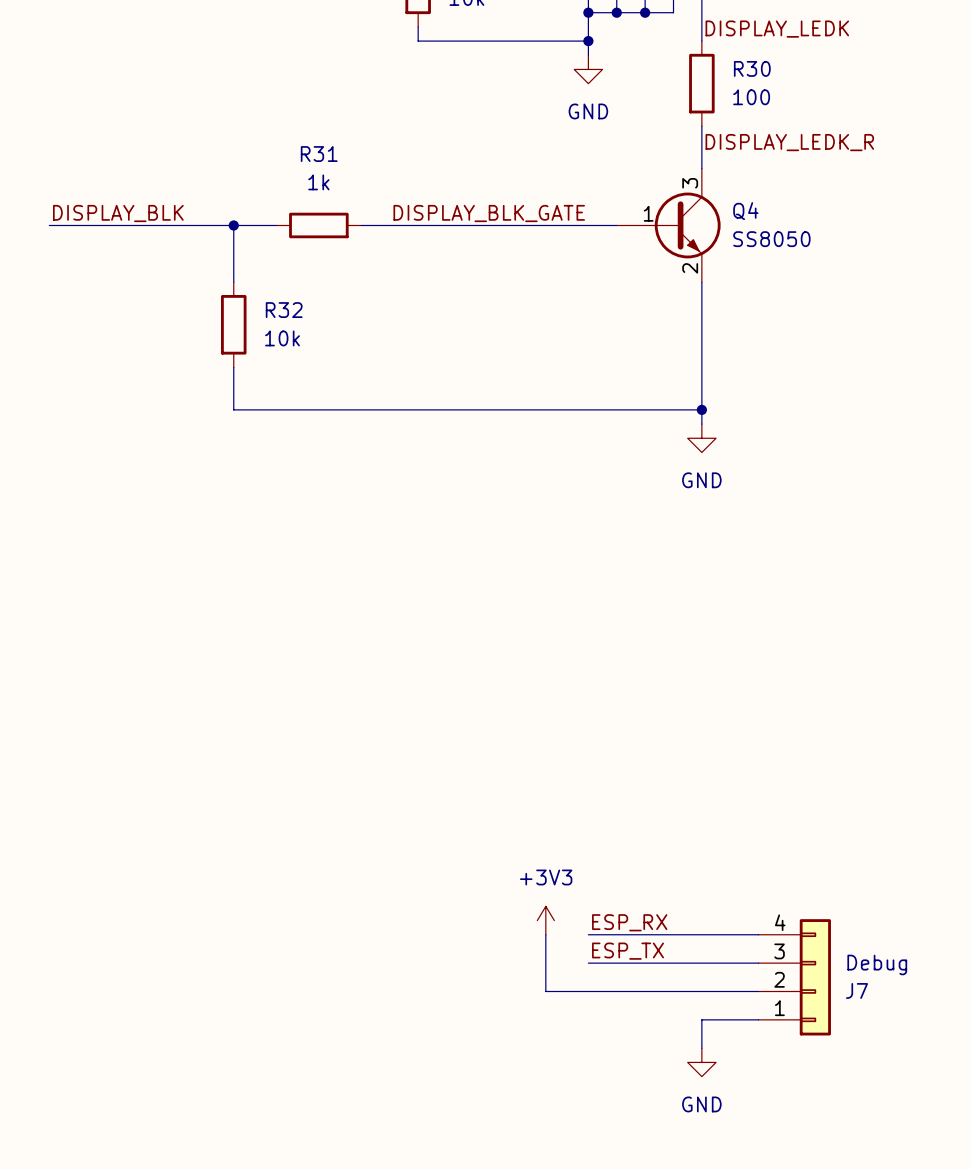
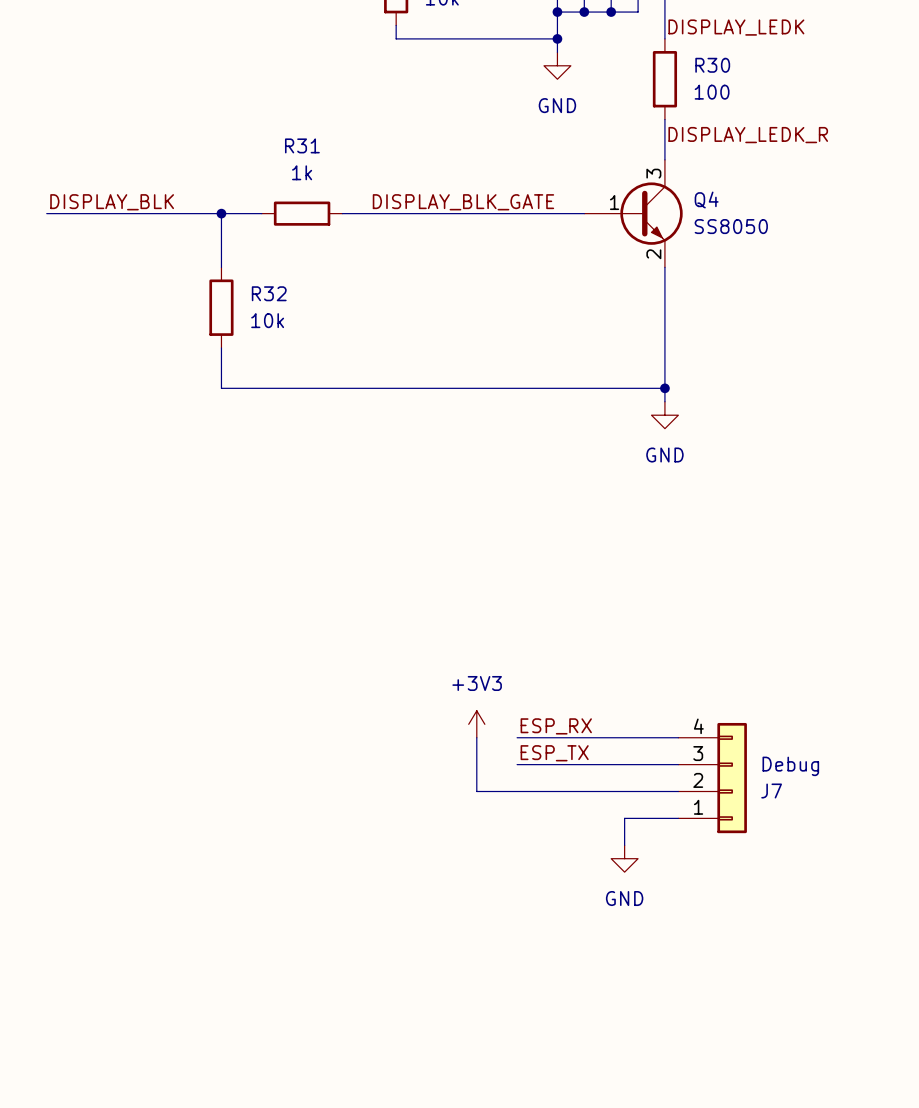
power symbol position: +3V3 (545, 920) -> +3V3 (476, 724)
label position: ESP_RX (629, 922) -> ESP_RX (556, 726)
wire: (545, 934) (545, 991) (758, 991) -> (476, 737) (476, 791) (678, 791)
wire: (588, 934) (758, 934) -> (517, 764) (678, 764)
label position: ESP_TX (628, 951) -> ESP_TX (554, 753)
wire: (588, 963) (758, 963) -> (517, 737) (678, 737)
J7 position: (794, 977) -> (712, 778)
wire: (758, 1019) (701, 1019) (701, 1048) -> (678, 818) (624, 818) (624, 845)
power symbol position: GND (701, 1062) -> GND (624, 858)

